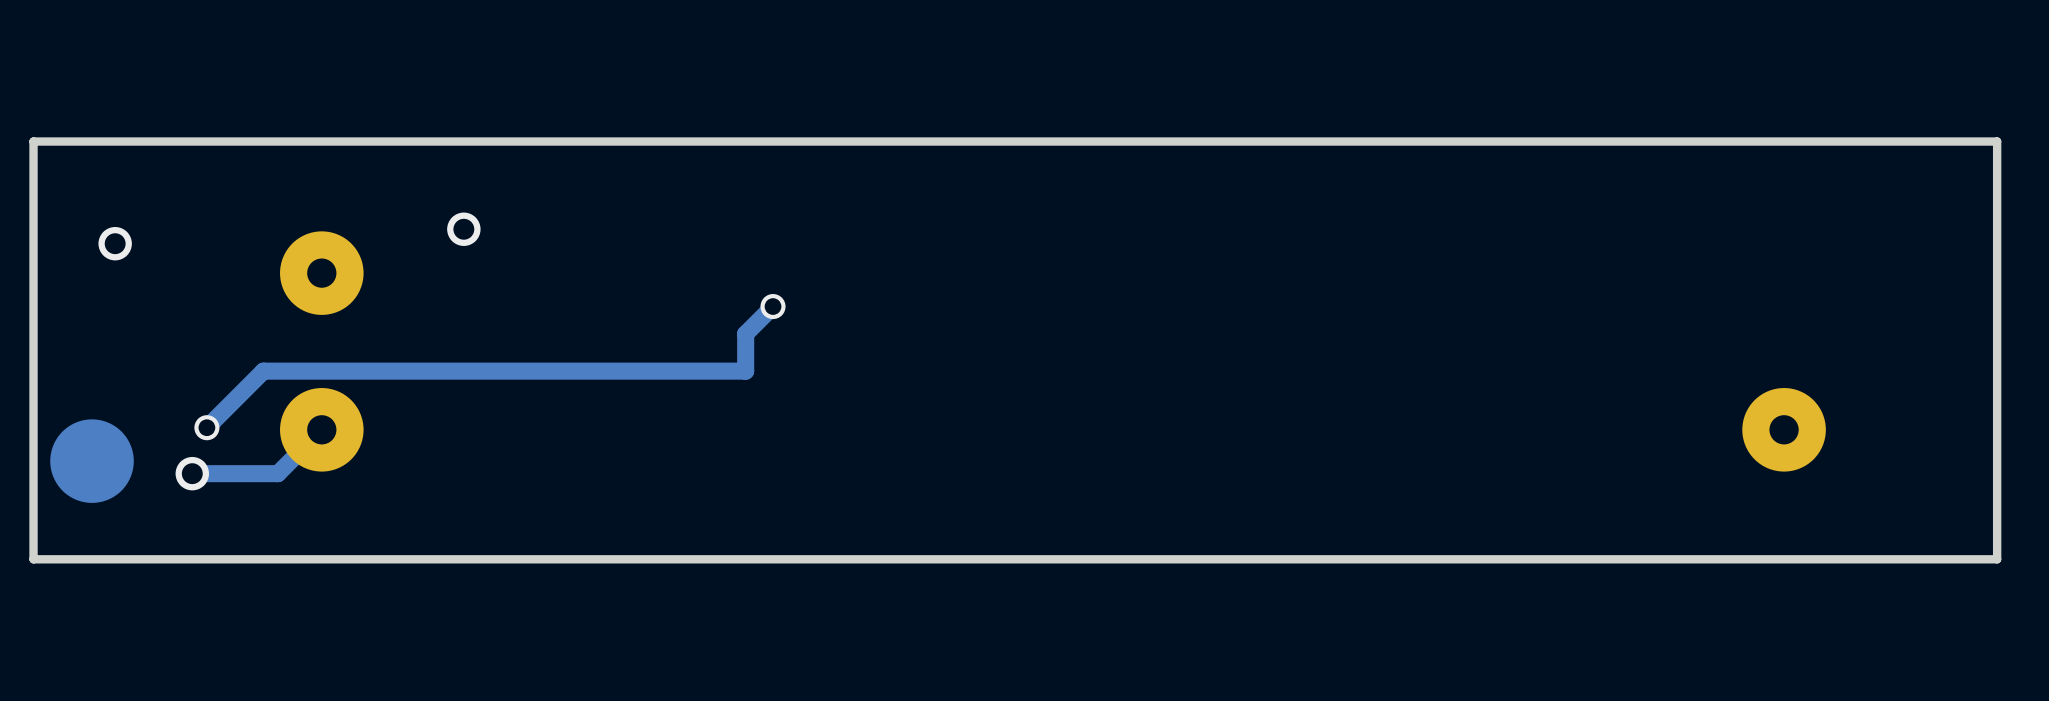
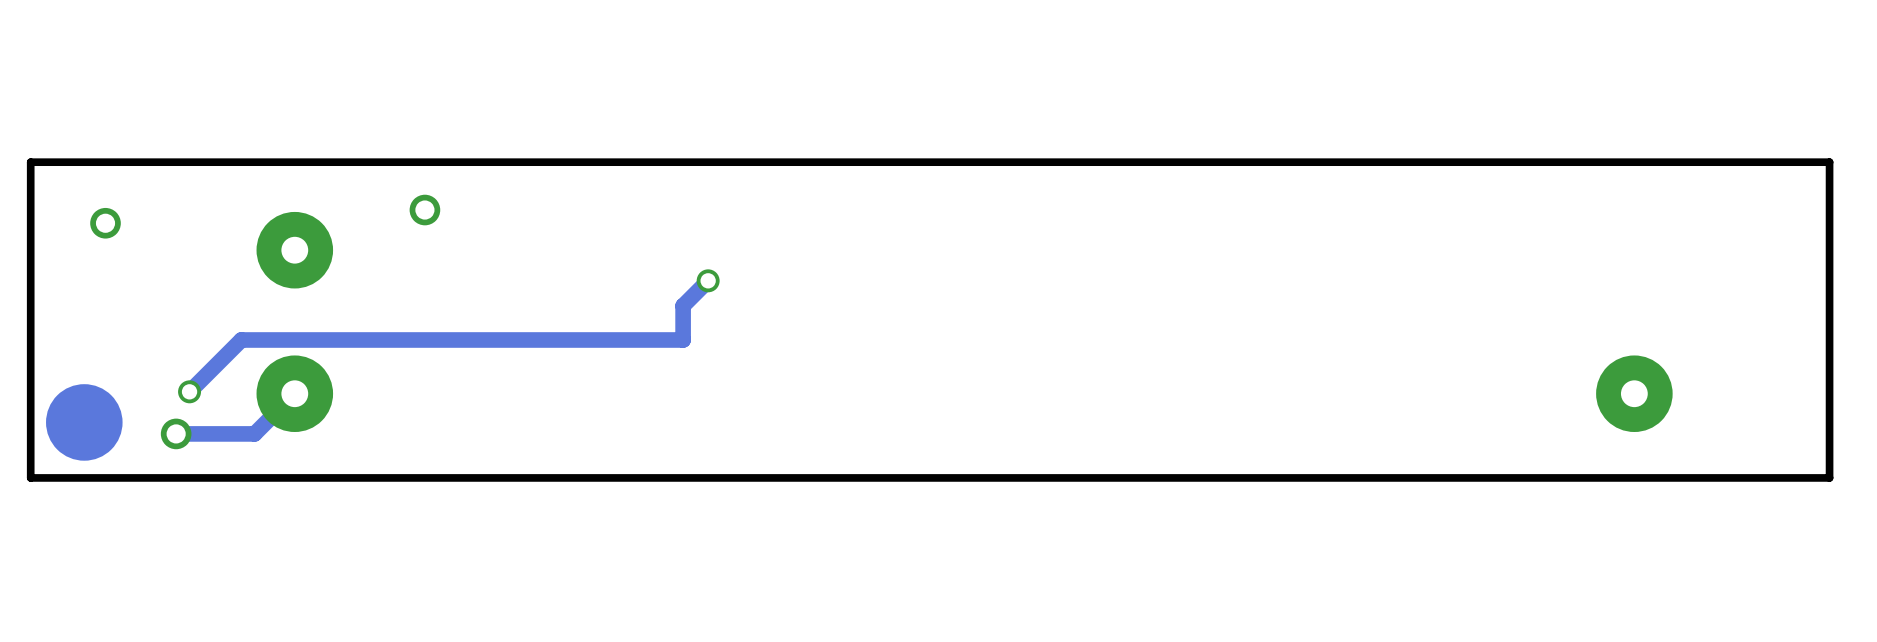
board edge: (1997, 177) (1997, 141) (33, 141) (33, 177) -> (1829, 162) (30, 162)
board edge: (1997, 521) (1997, 559) (33, 559) (33, 521) -> (1829, 477) (30, 477)

